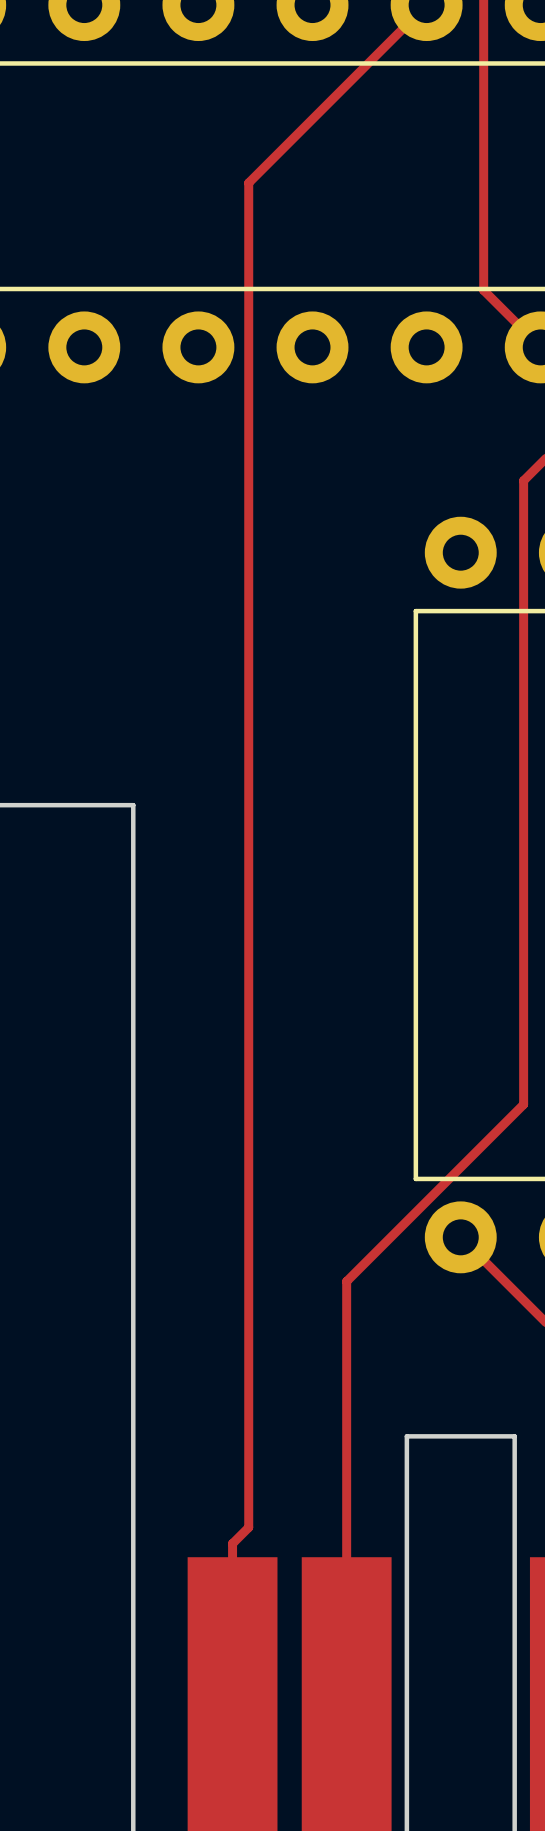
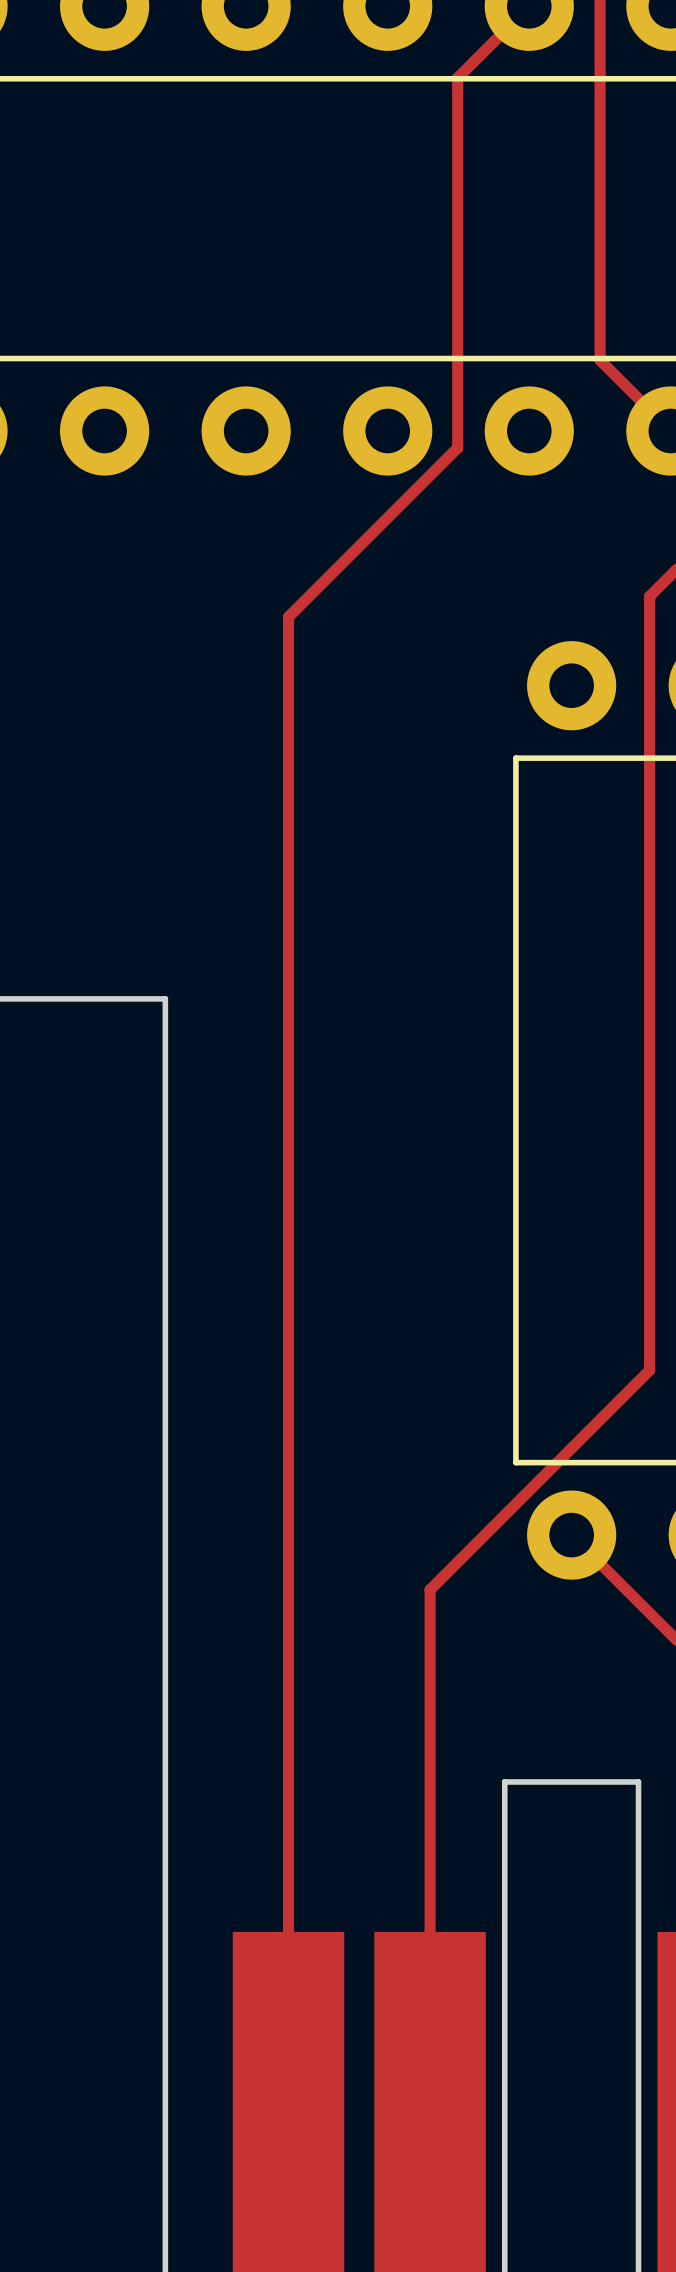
track: (368, 62) (248, 182) (248, 1527) (232, 1543) -> (457, 77) (457, 447) (288, 617) (288, 1915)

